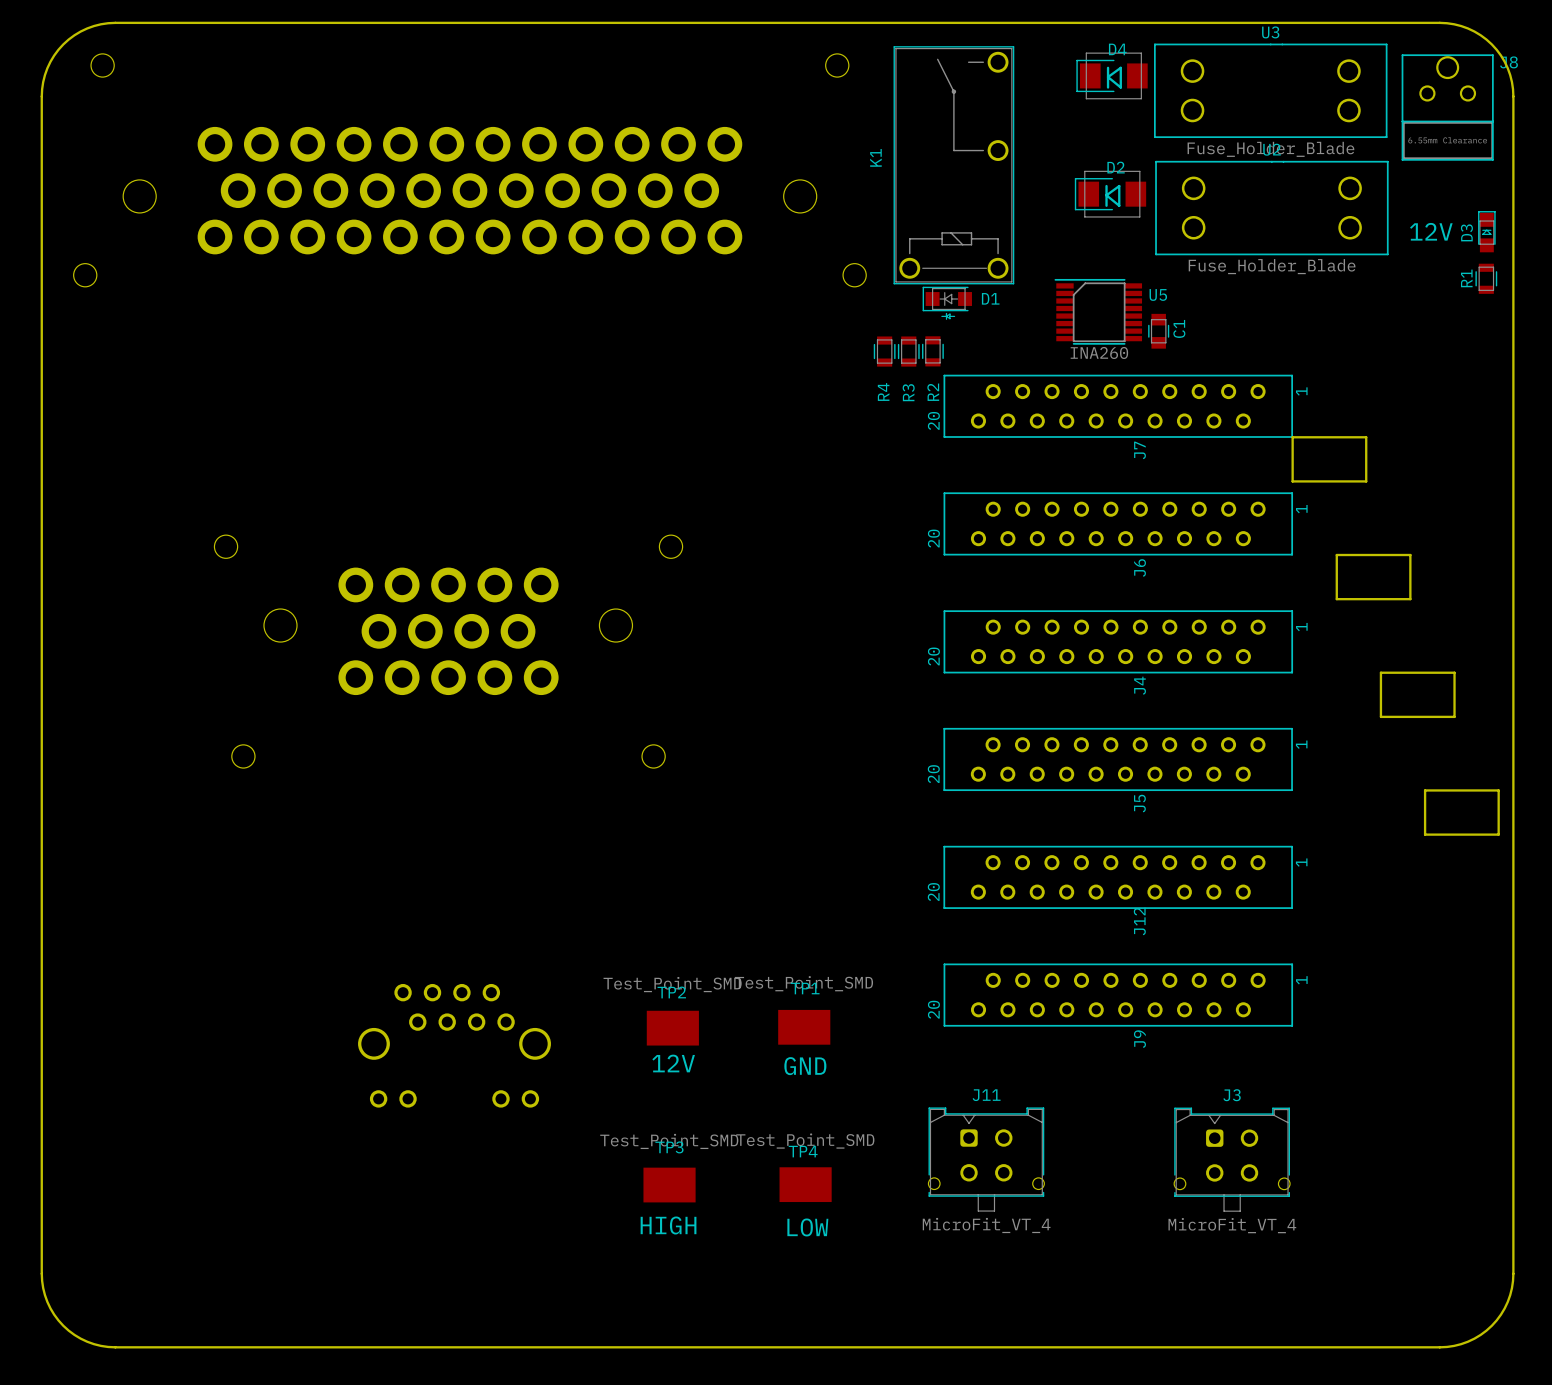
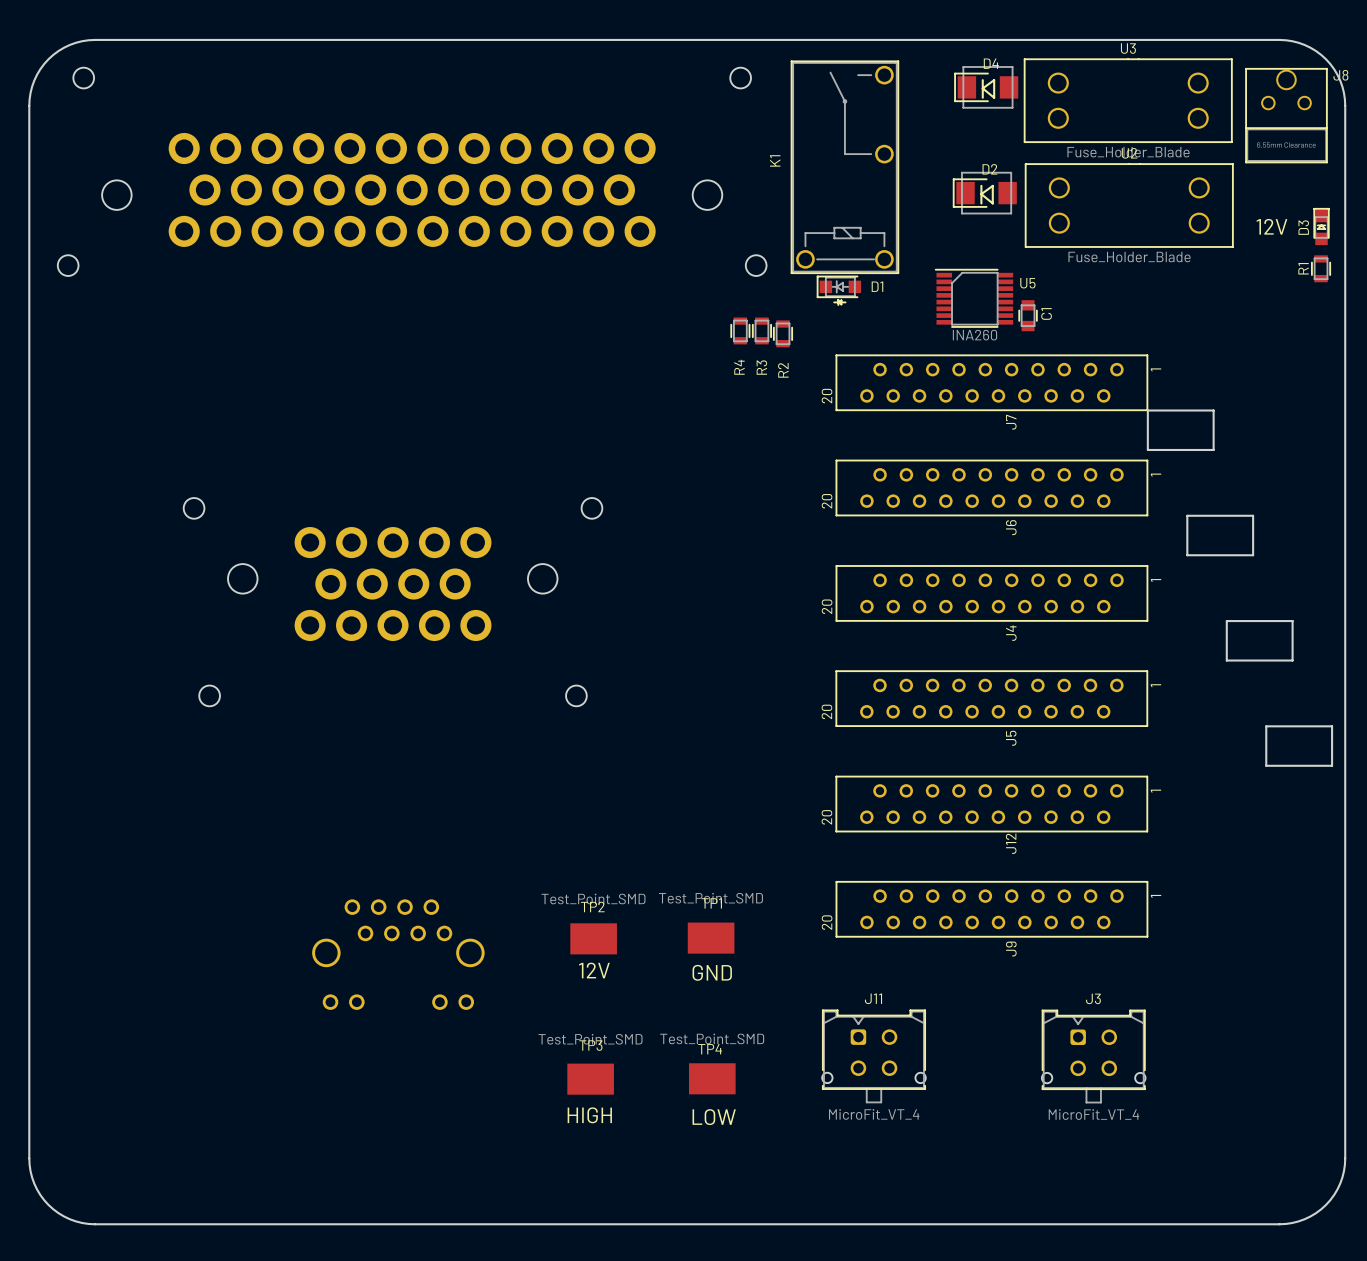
R4: none -> (740, 330)
R3 position: (908, 351) -> (761, 330)
R2: (932, 351) -> none
R4 name: R4 (883, 392) -> R2 (783, 370)

